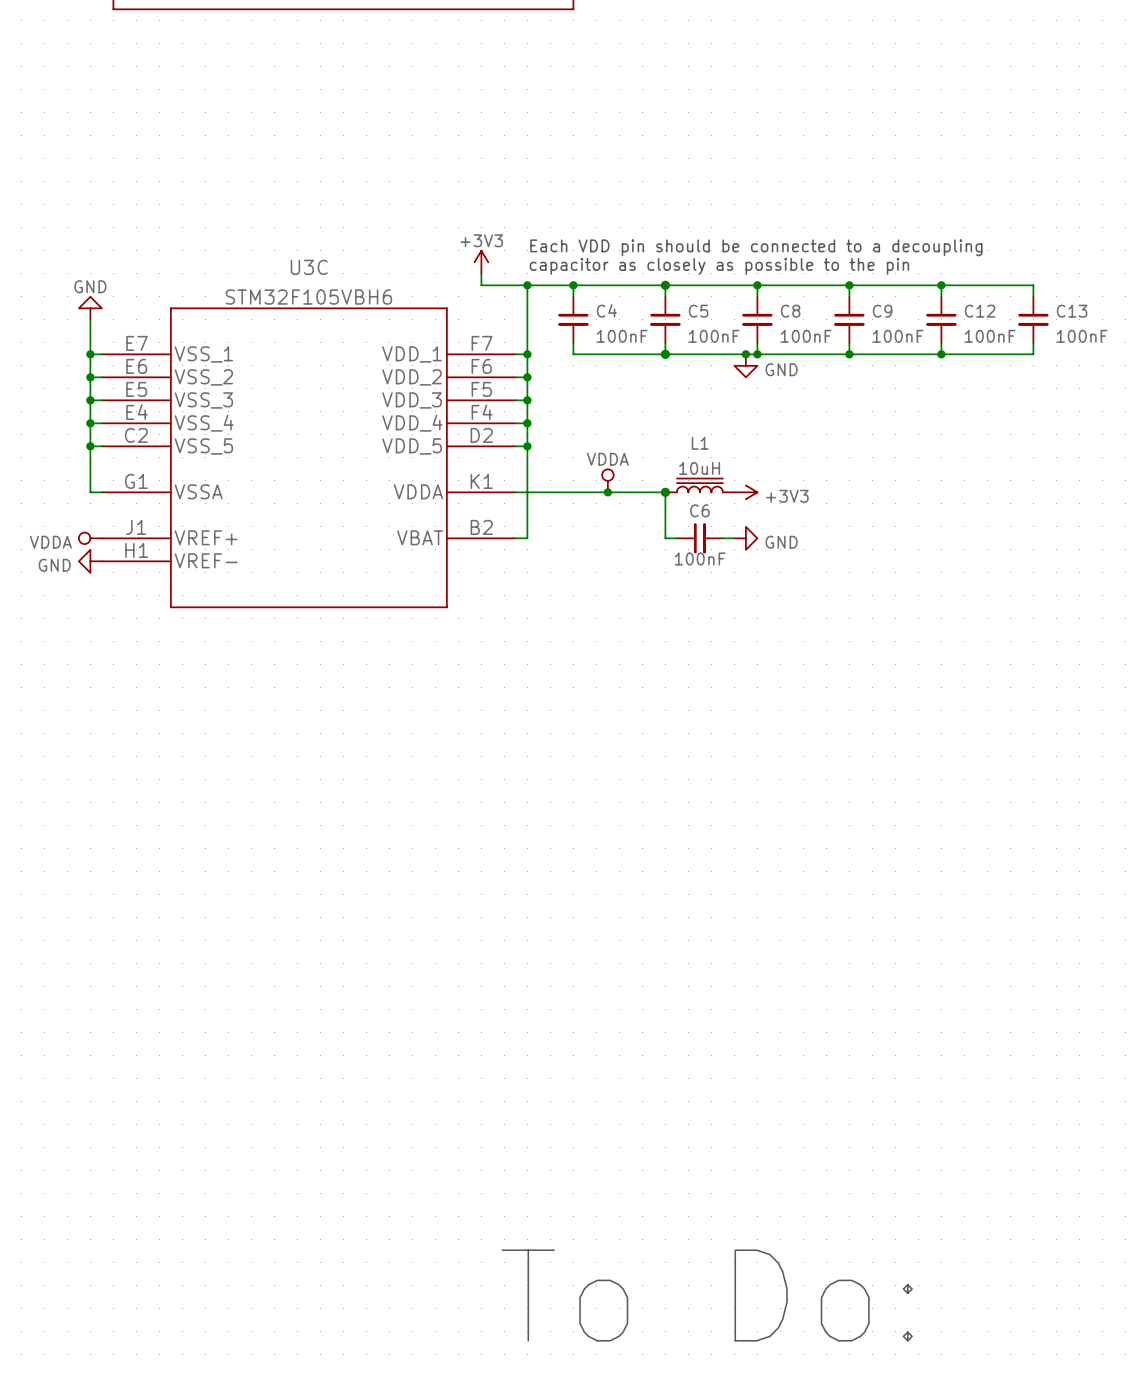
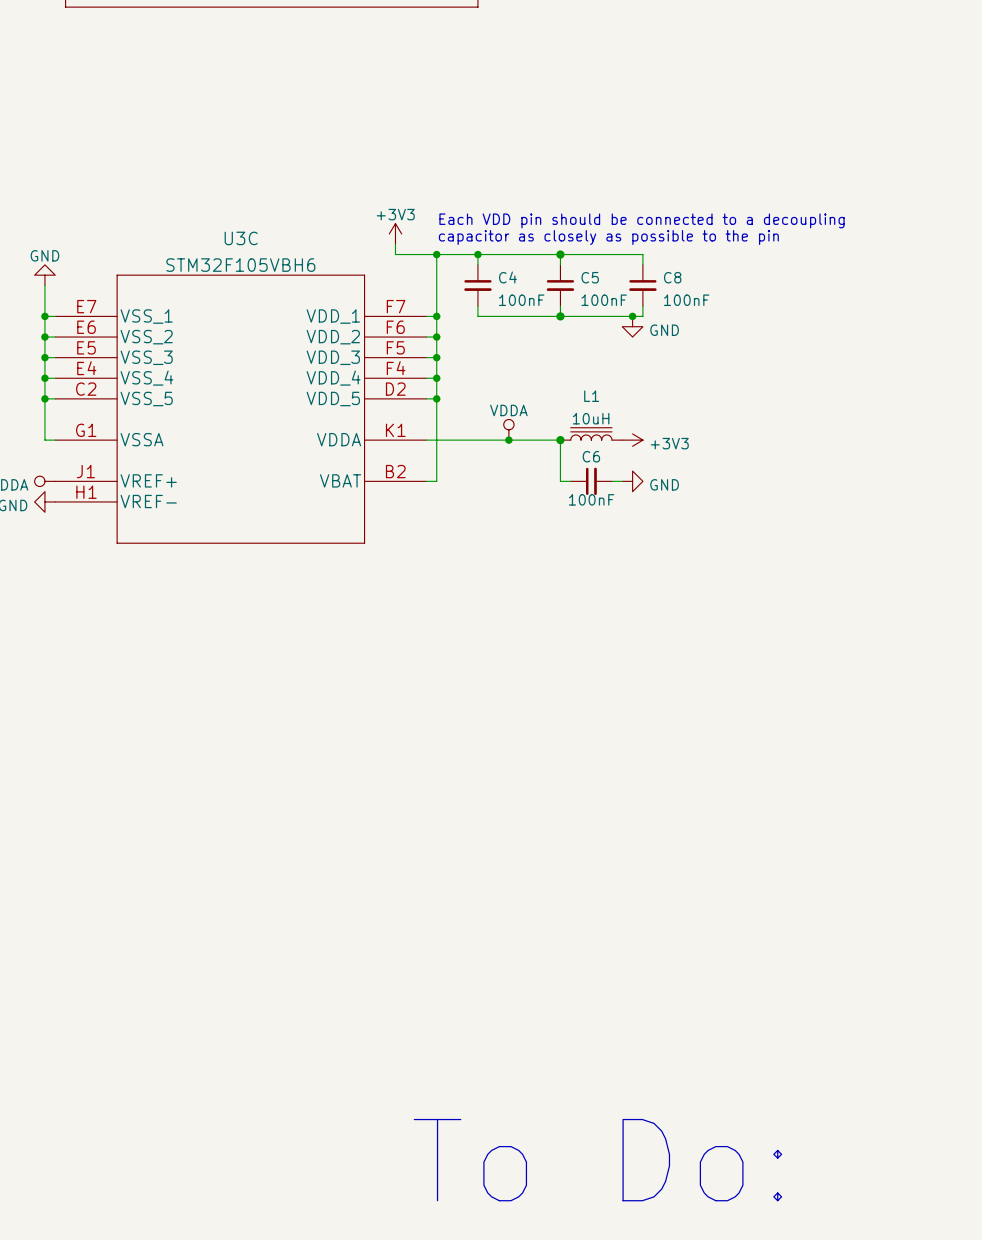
wire: (757, 285) (1033, 285) (1033, 296) -> none
junction: (757, 285) -> none
wire: (849, 285) (849, 296) -> none
junction: (849, 285) -> none
wire: (941, 285) (941, 296) -> none
junction: (941, 285) -> none
C9: 100nF (849, 319) -> none
C12: 100nF (941, 319) -> none
C13: 100nF (1033, 319) -> none
wire: (849, 342) (849, 354) -> none
wire: (941, 342) (941, 354) -> none
wire: (1033, 342) (1033, 354) (757, 354) -> none
junction: (757, 354) -> none
junction: (849, 354) -> none
junction: (941, 354) -> none

